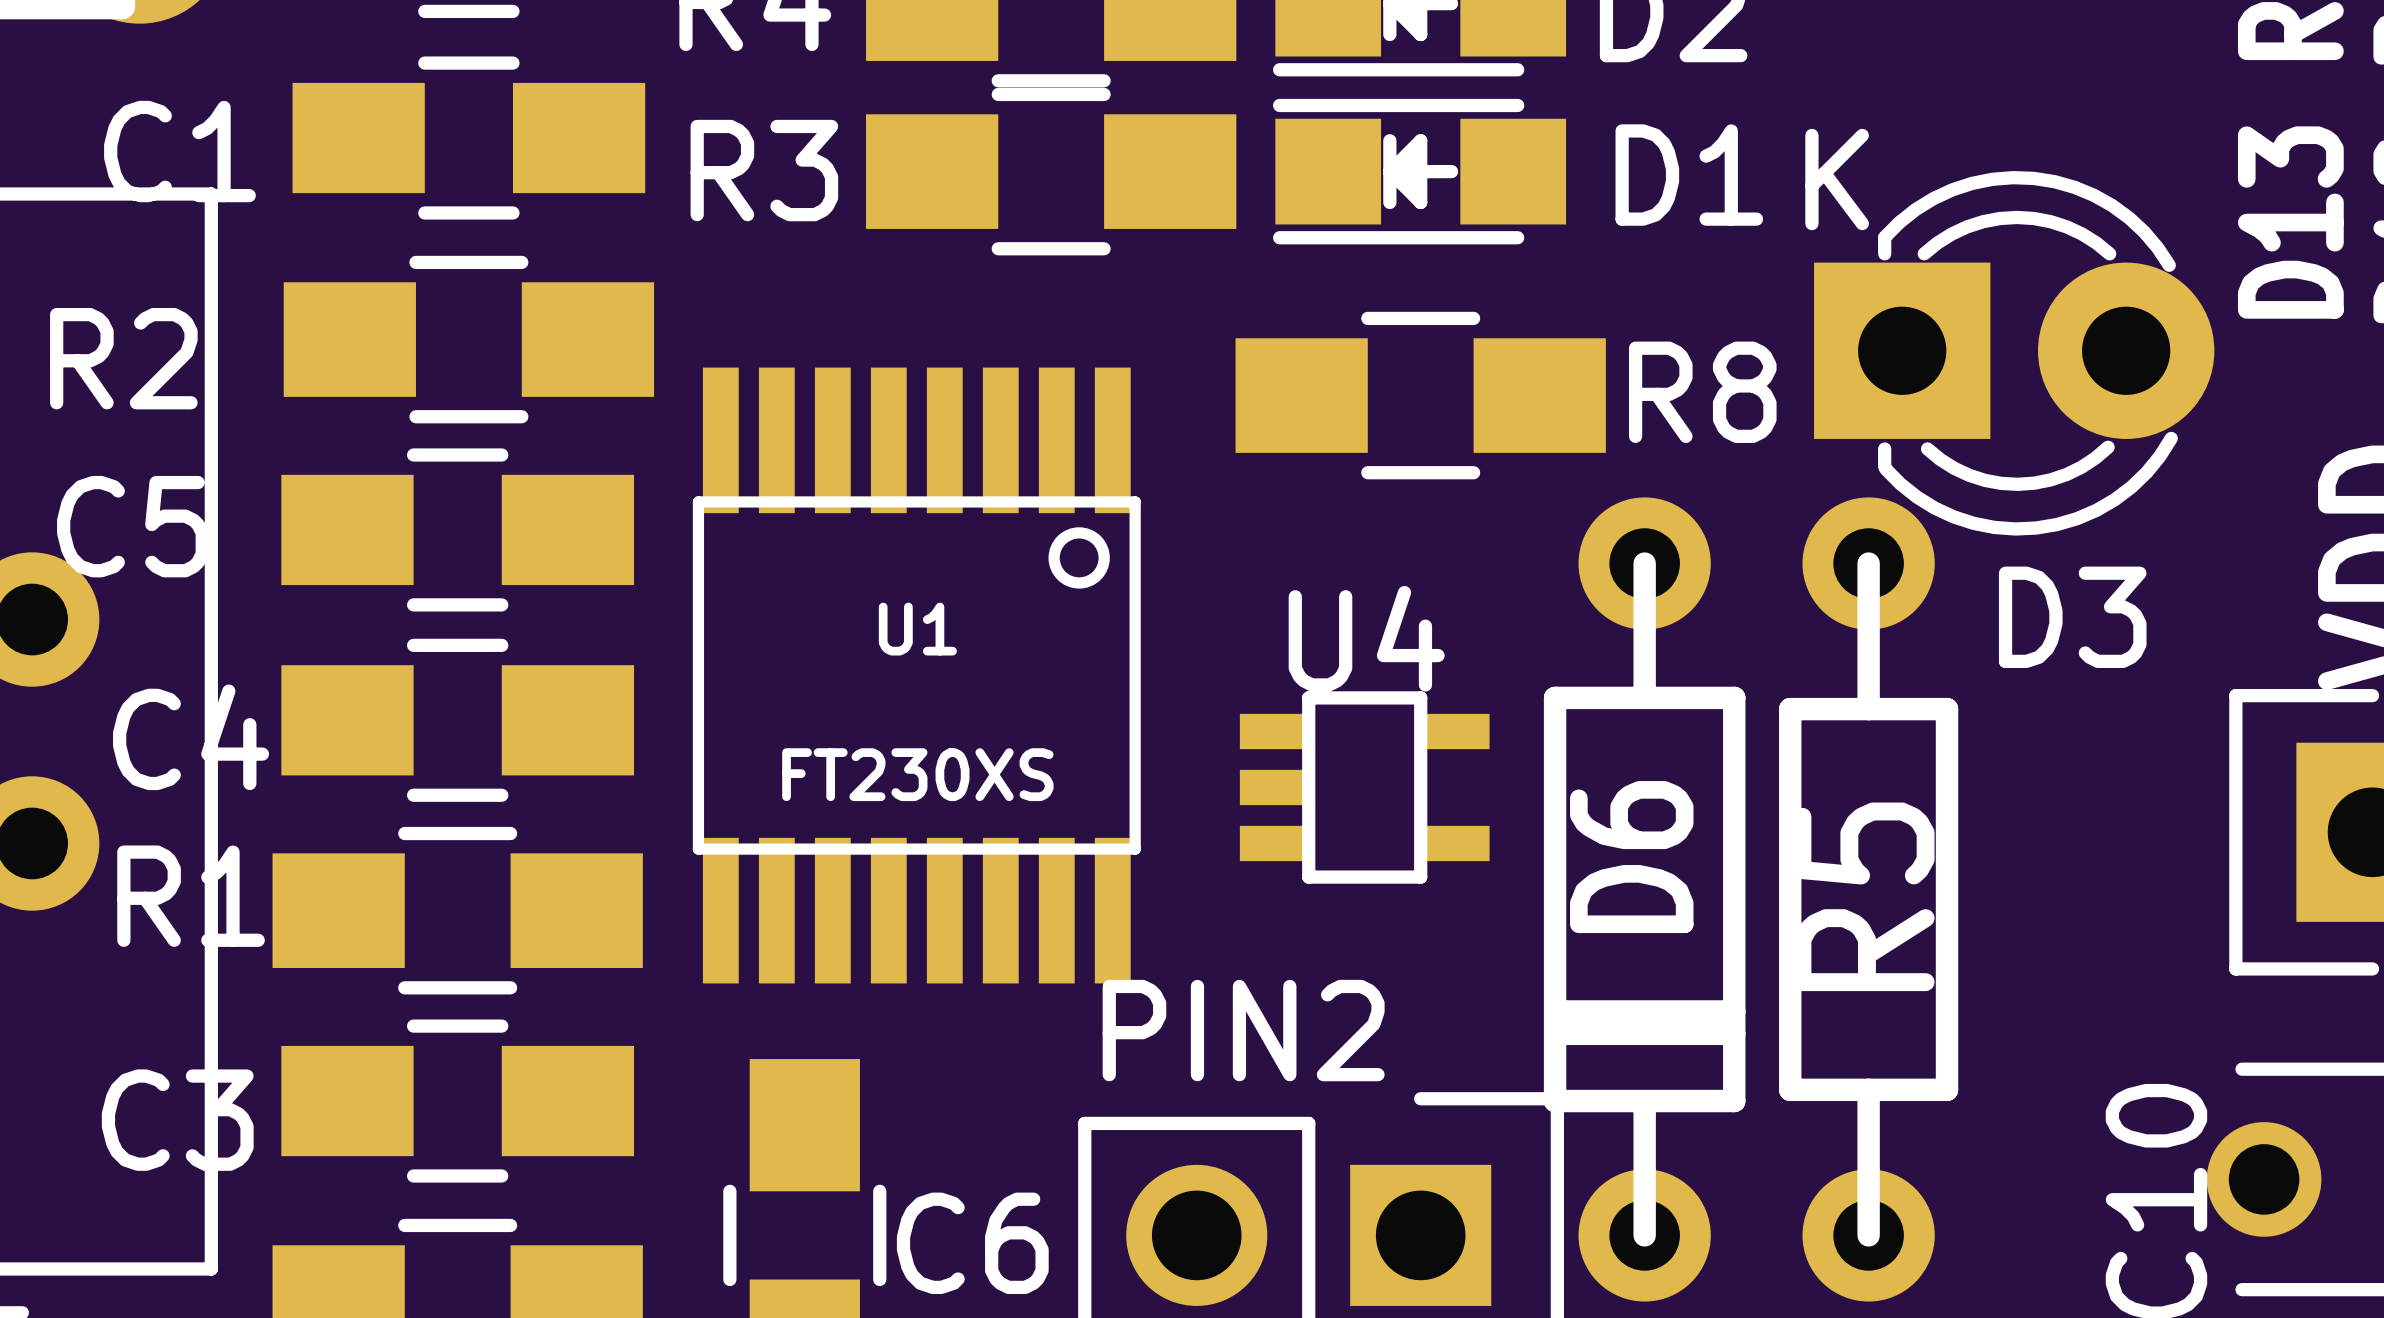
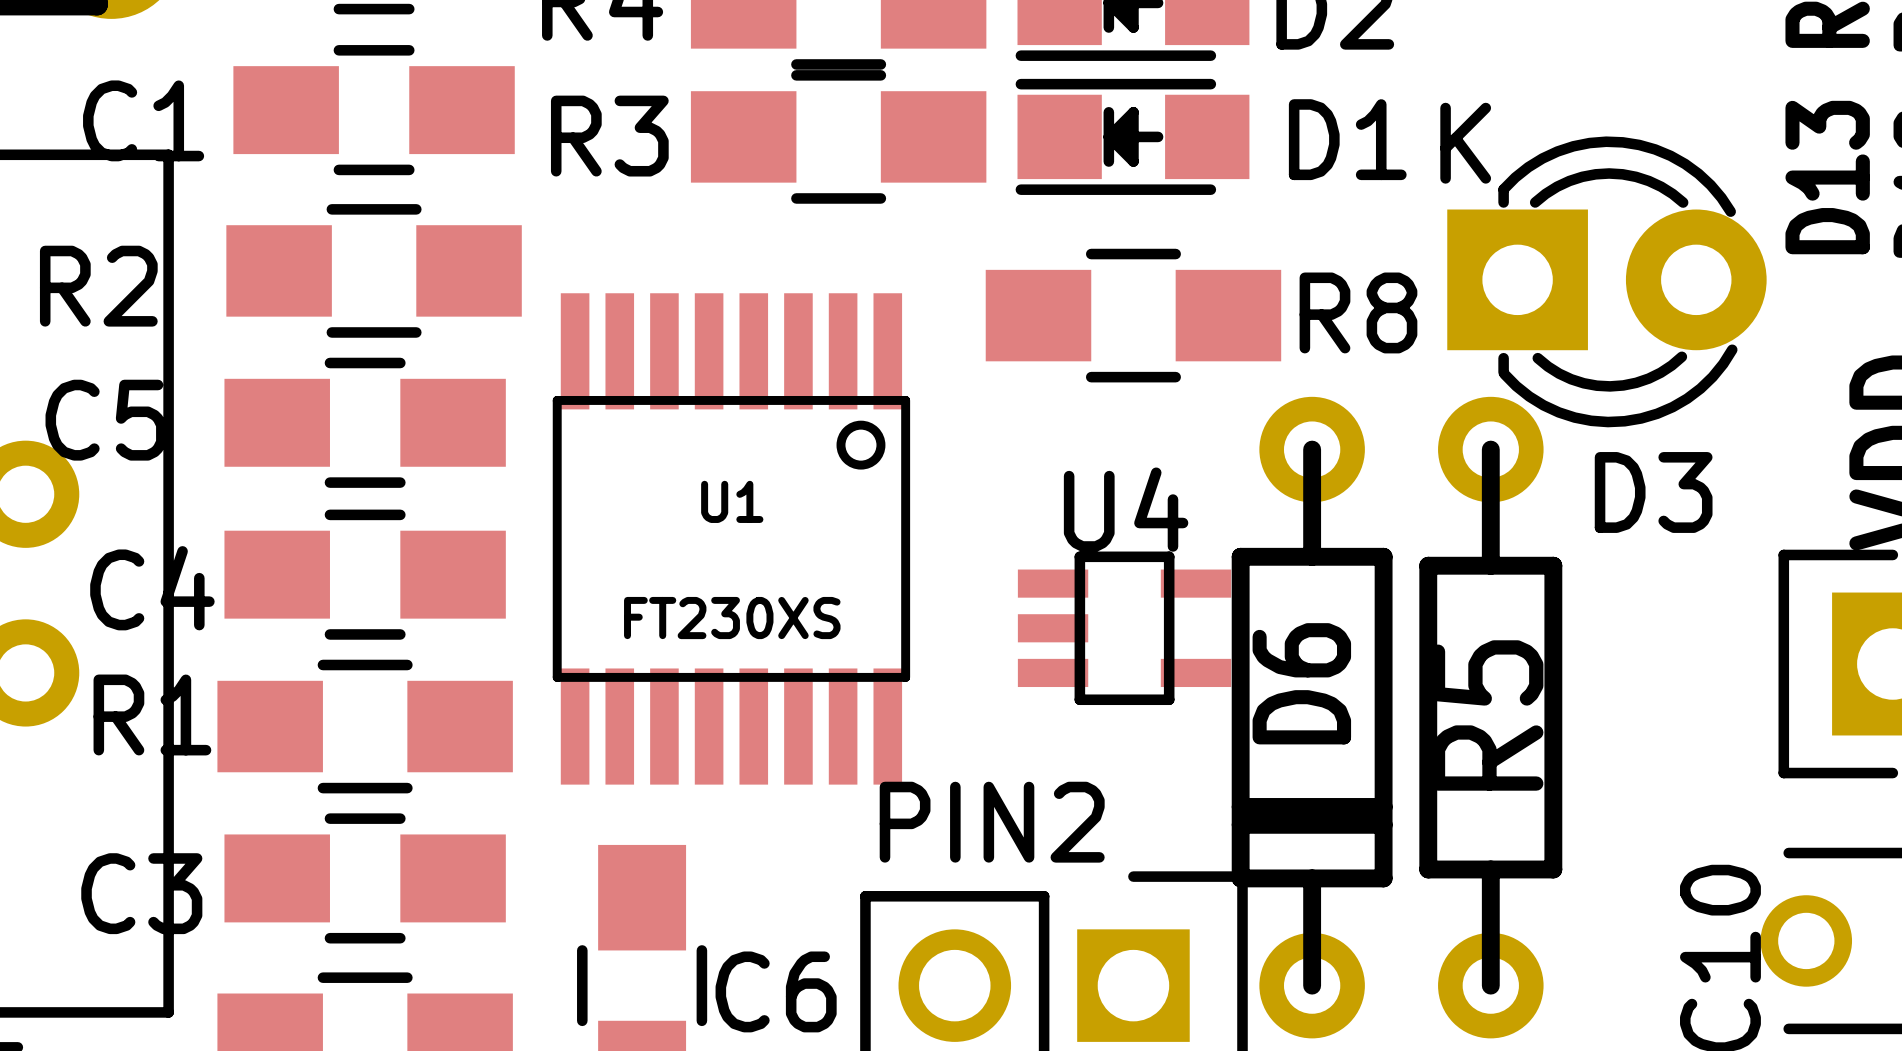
U4 name position: U4 (1366, 638) -> U4 (1126, 509)
U4 footprint: [1239, 691, 1490, 884] -> [1017, 551, 1232, 706]

